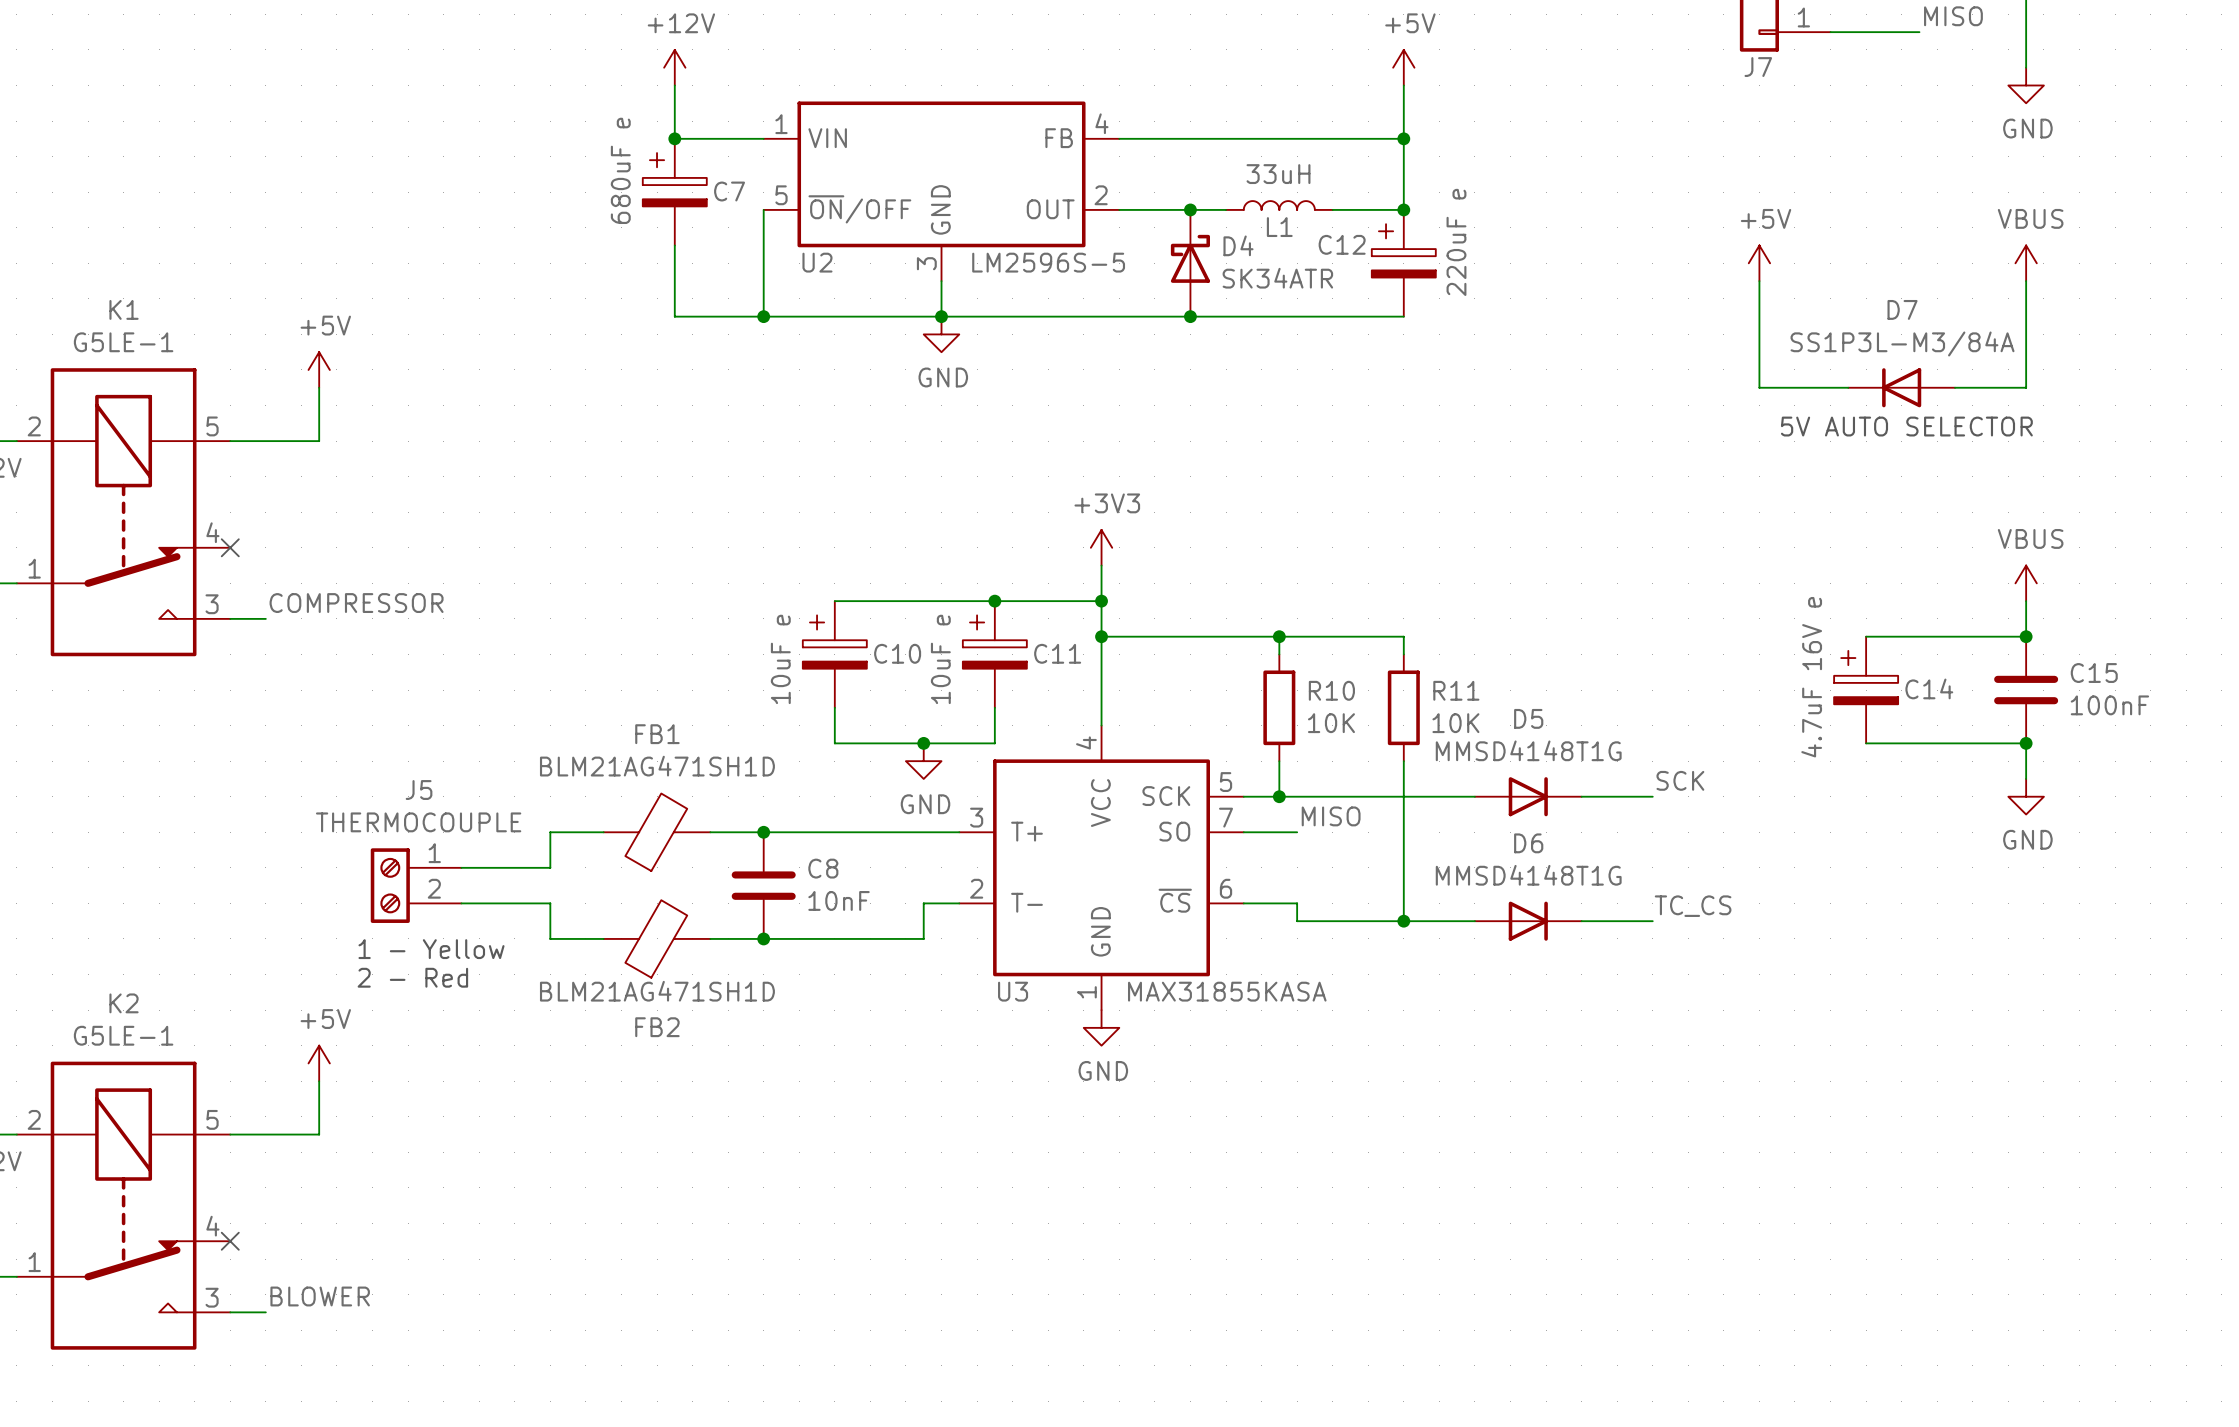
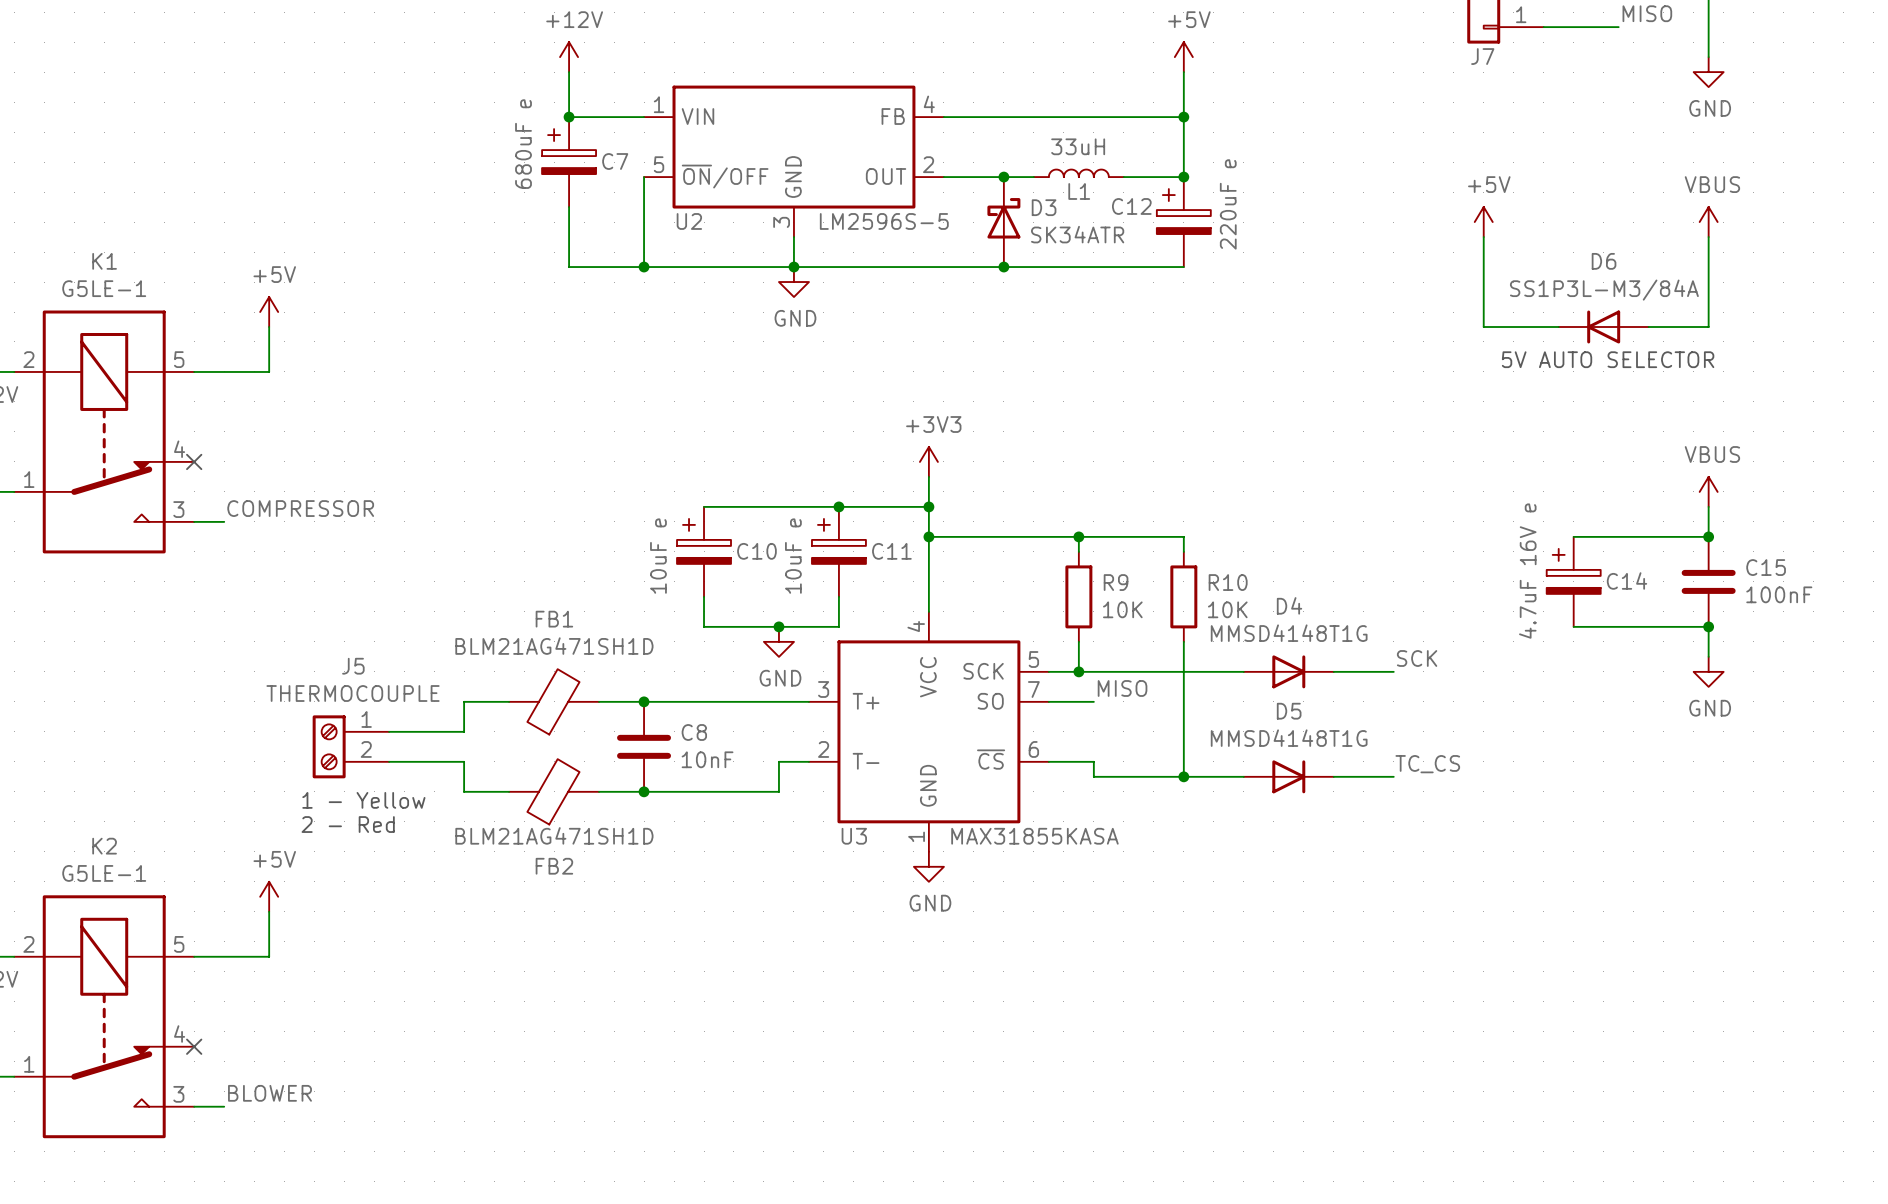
D4 name: D4 (1238, 245) -> D3 (1044, 207)
D7 name: D7 (1902, 309) -> D6 (1604, 261)
R10 name: R10 (1331, 690) -> R9 (1116, 582)
R11 name: R11 (1456, 690) -> R10 (1228, 582)
D5 name: D5 (1528, 718) -> D4 (1289, 605)
D6 name: D6 (1528, 843) -> D5 (1289, 711)

